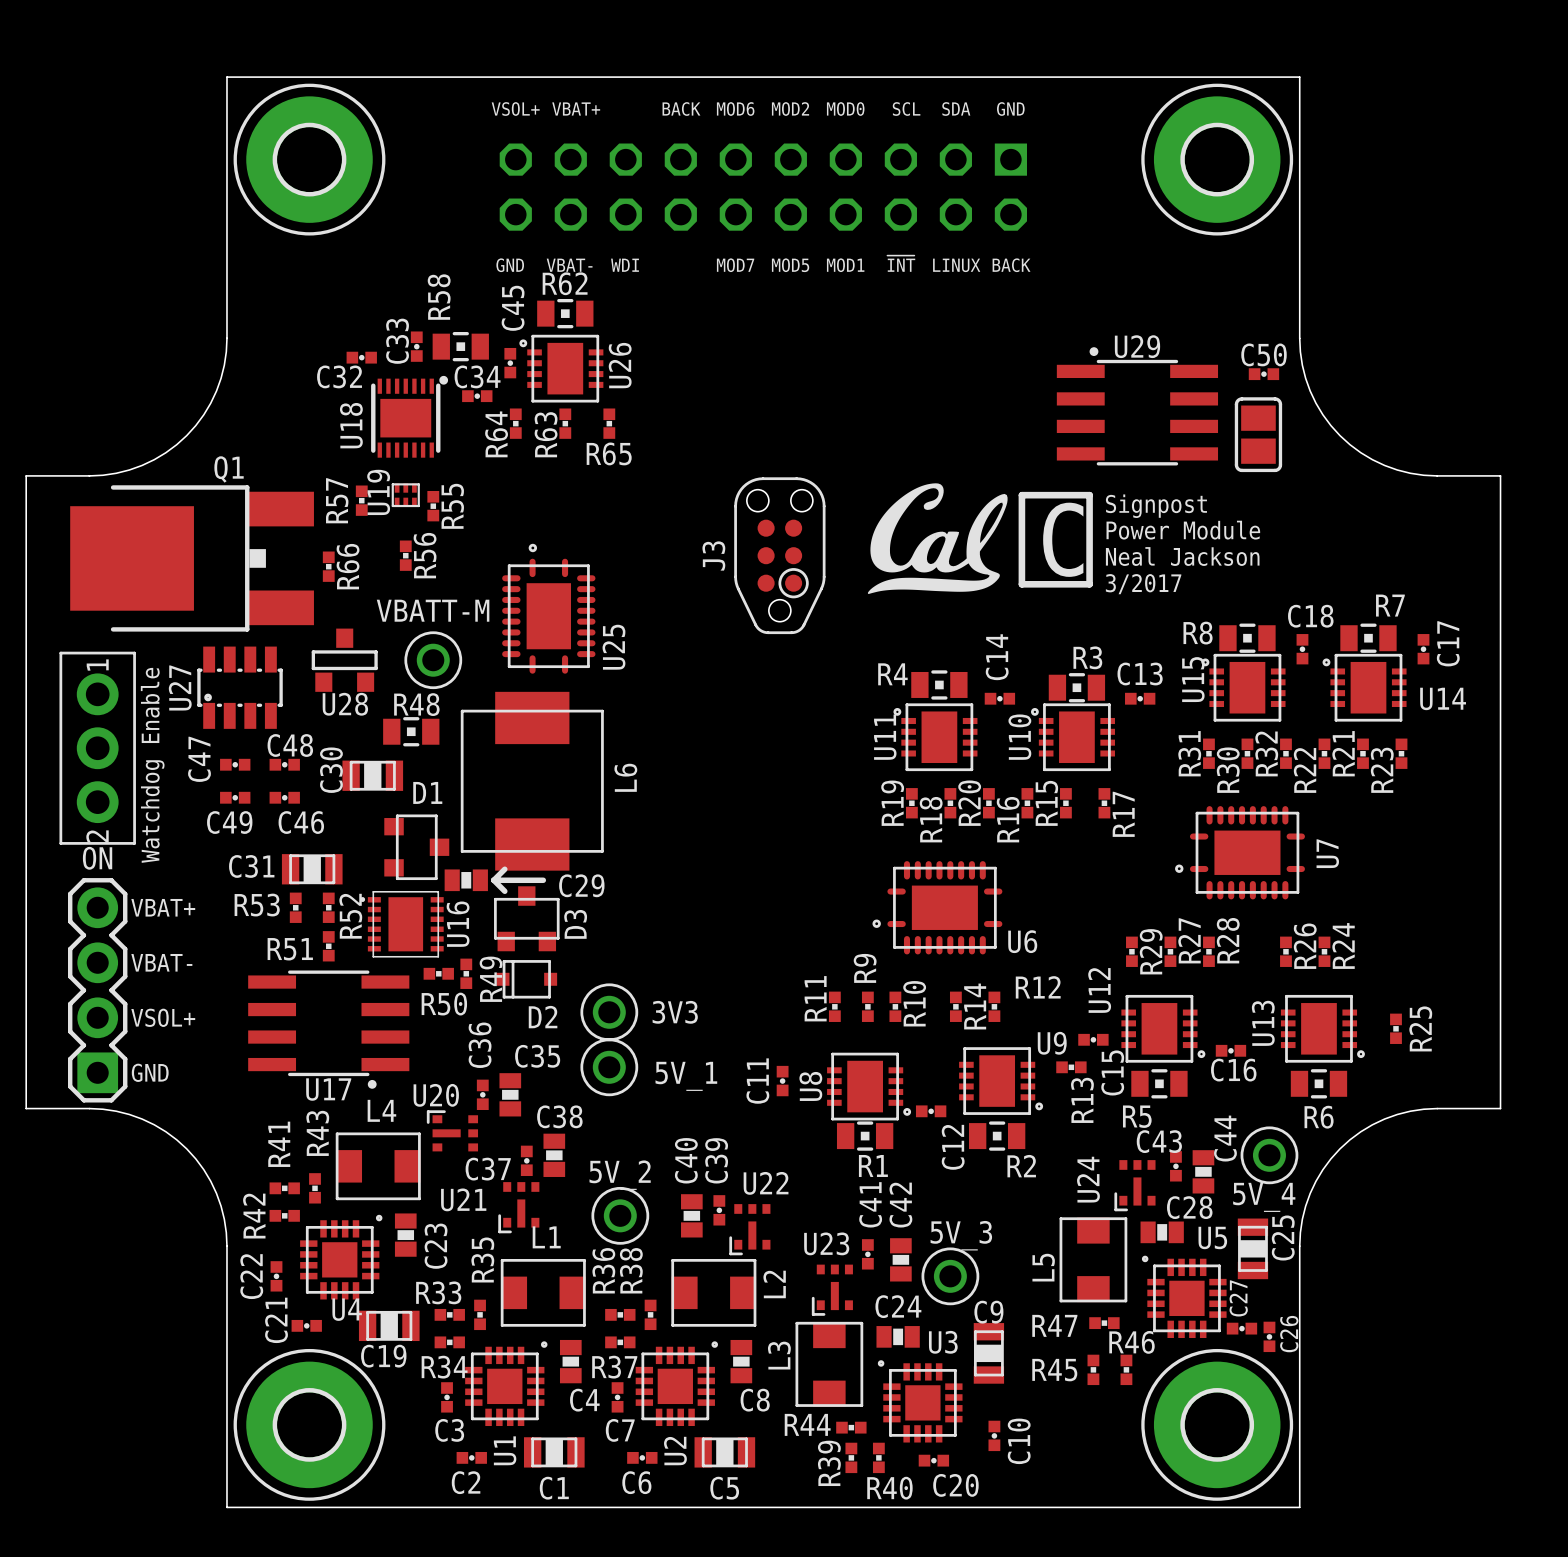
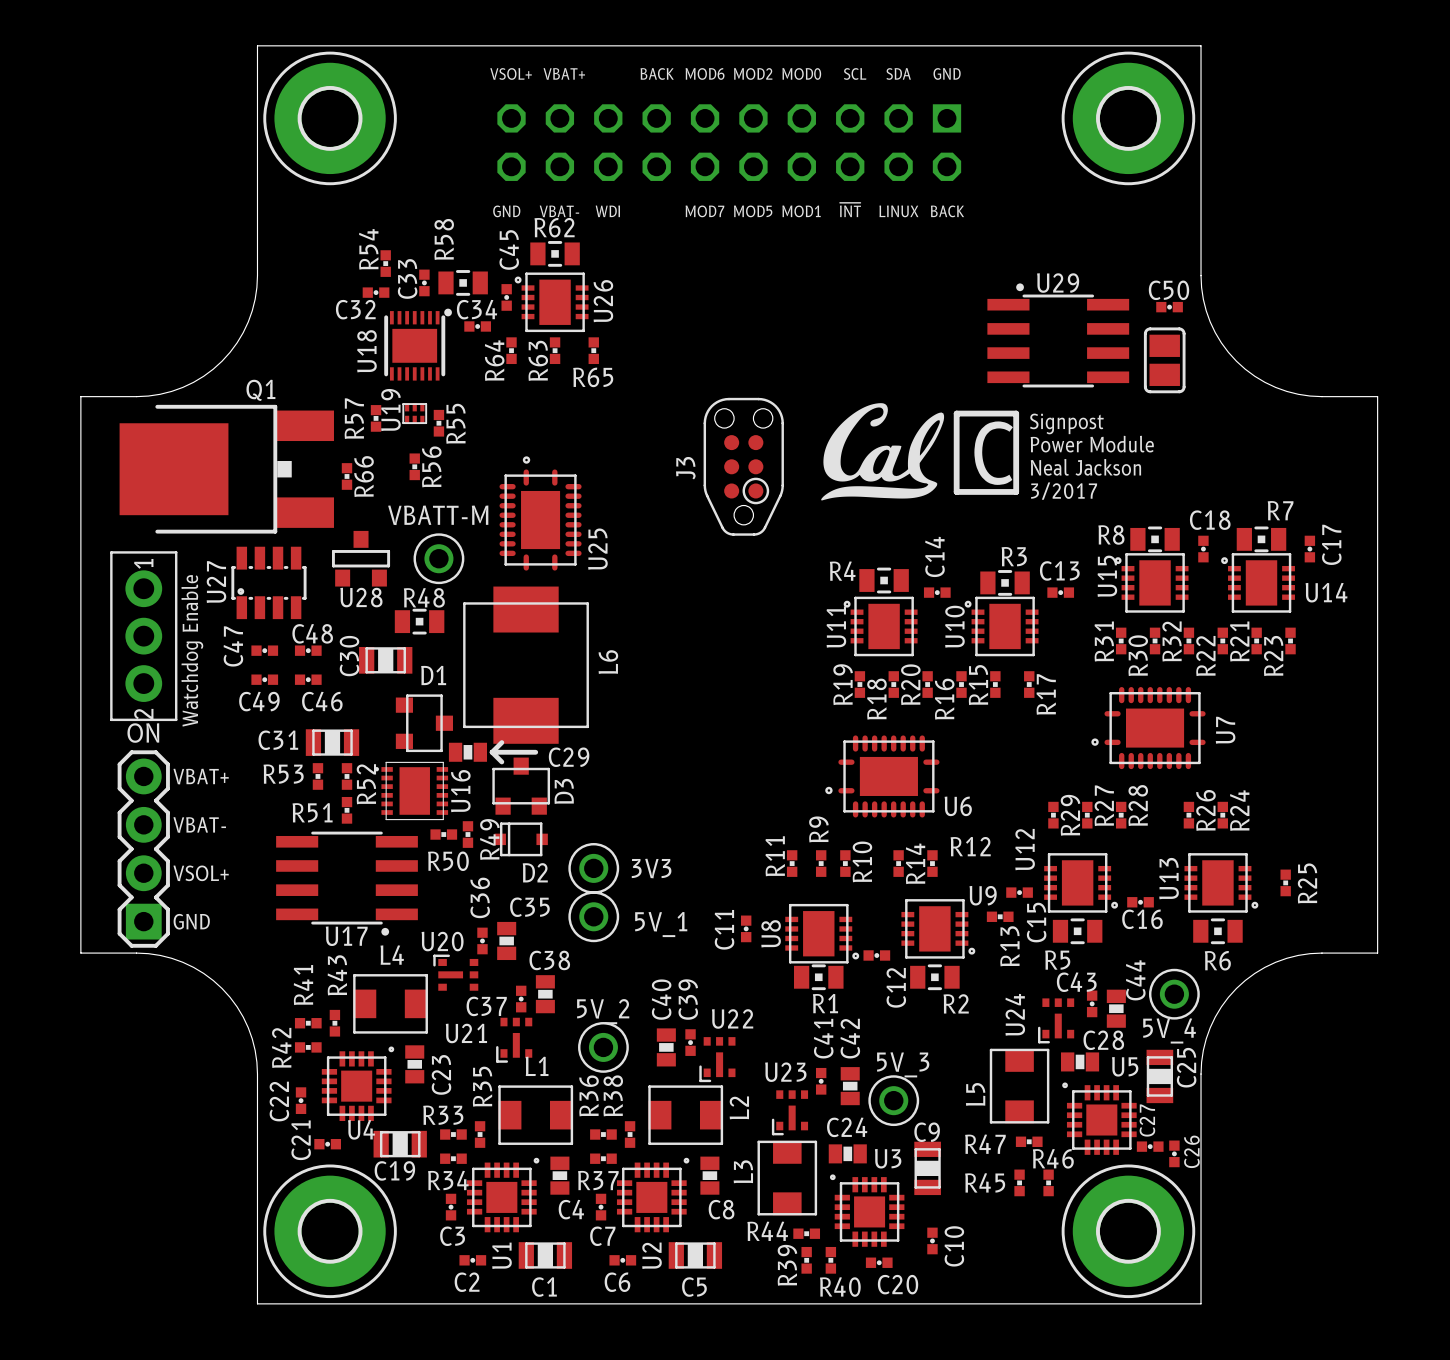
R54: none -> (385, 263)

